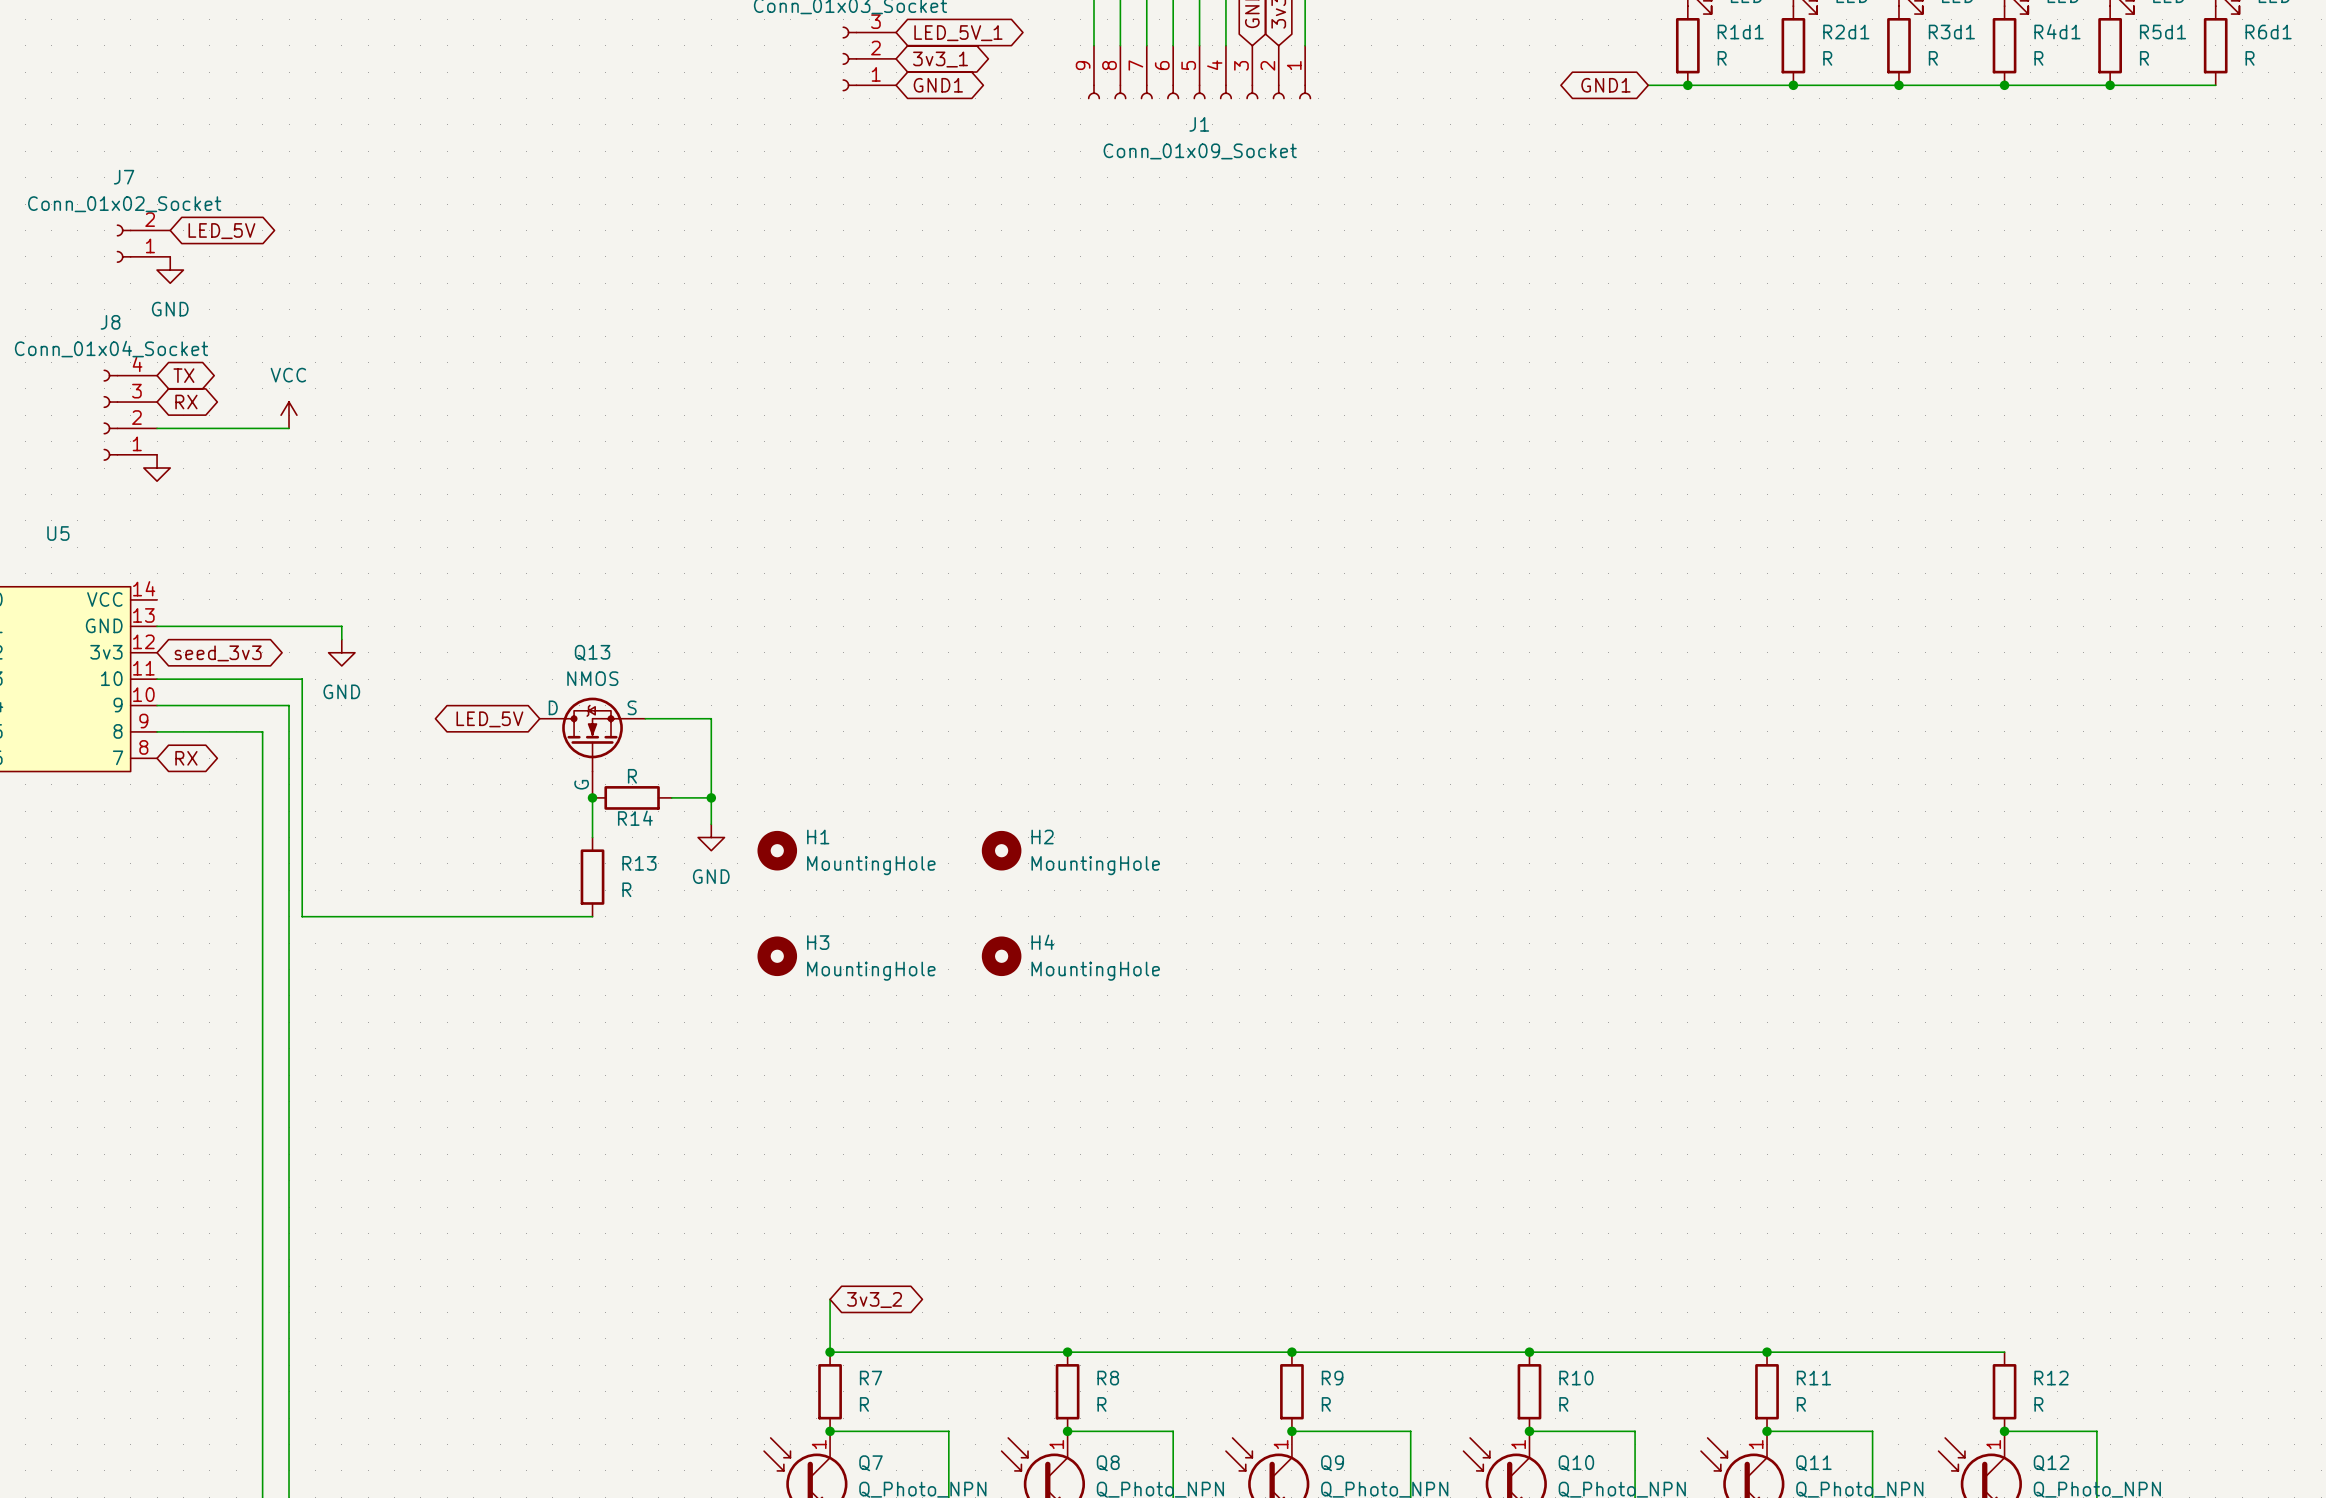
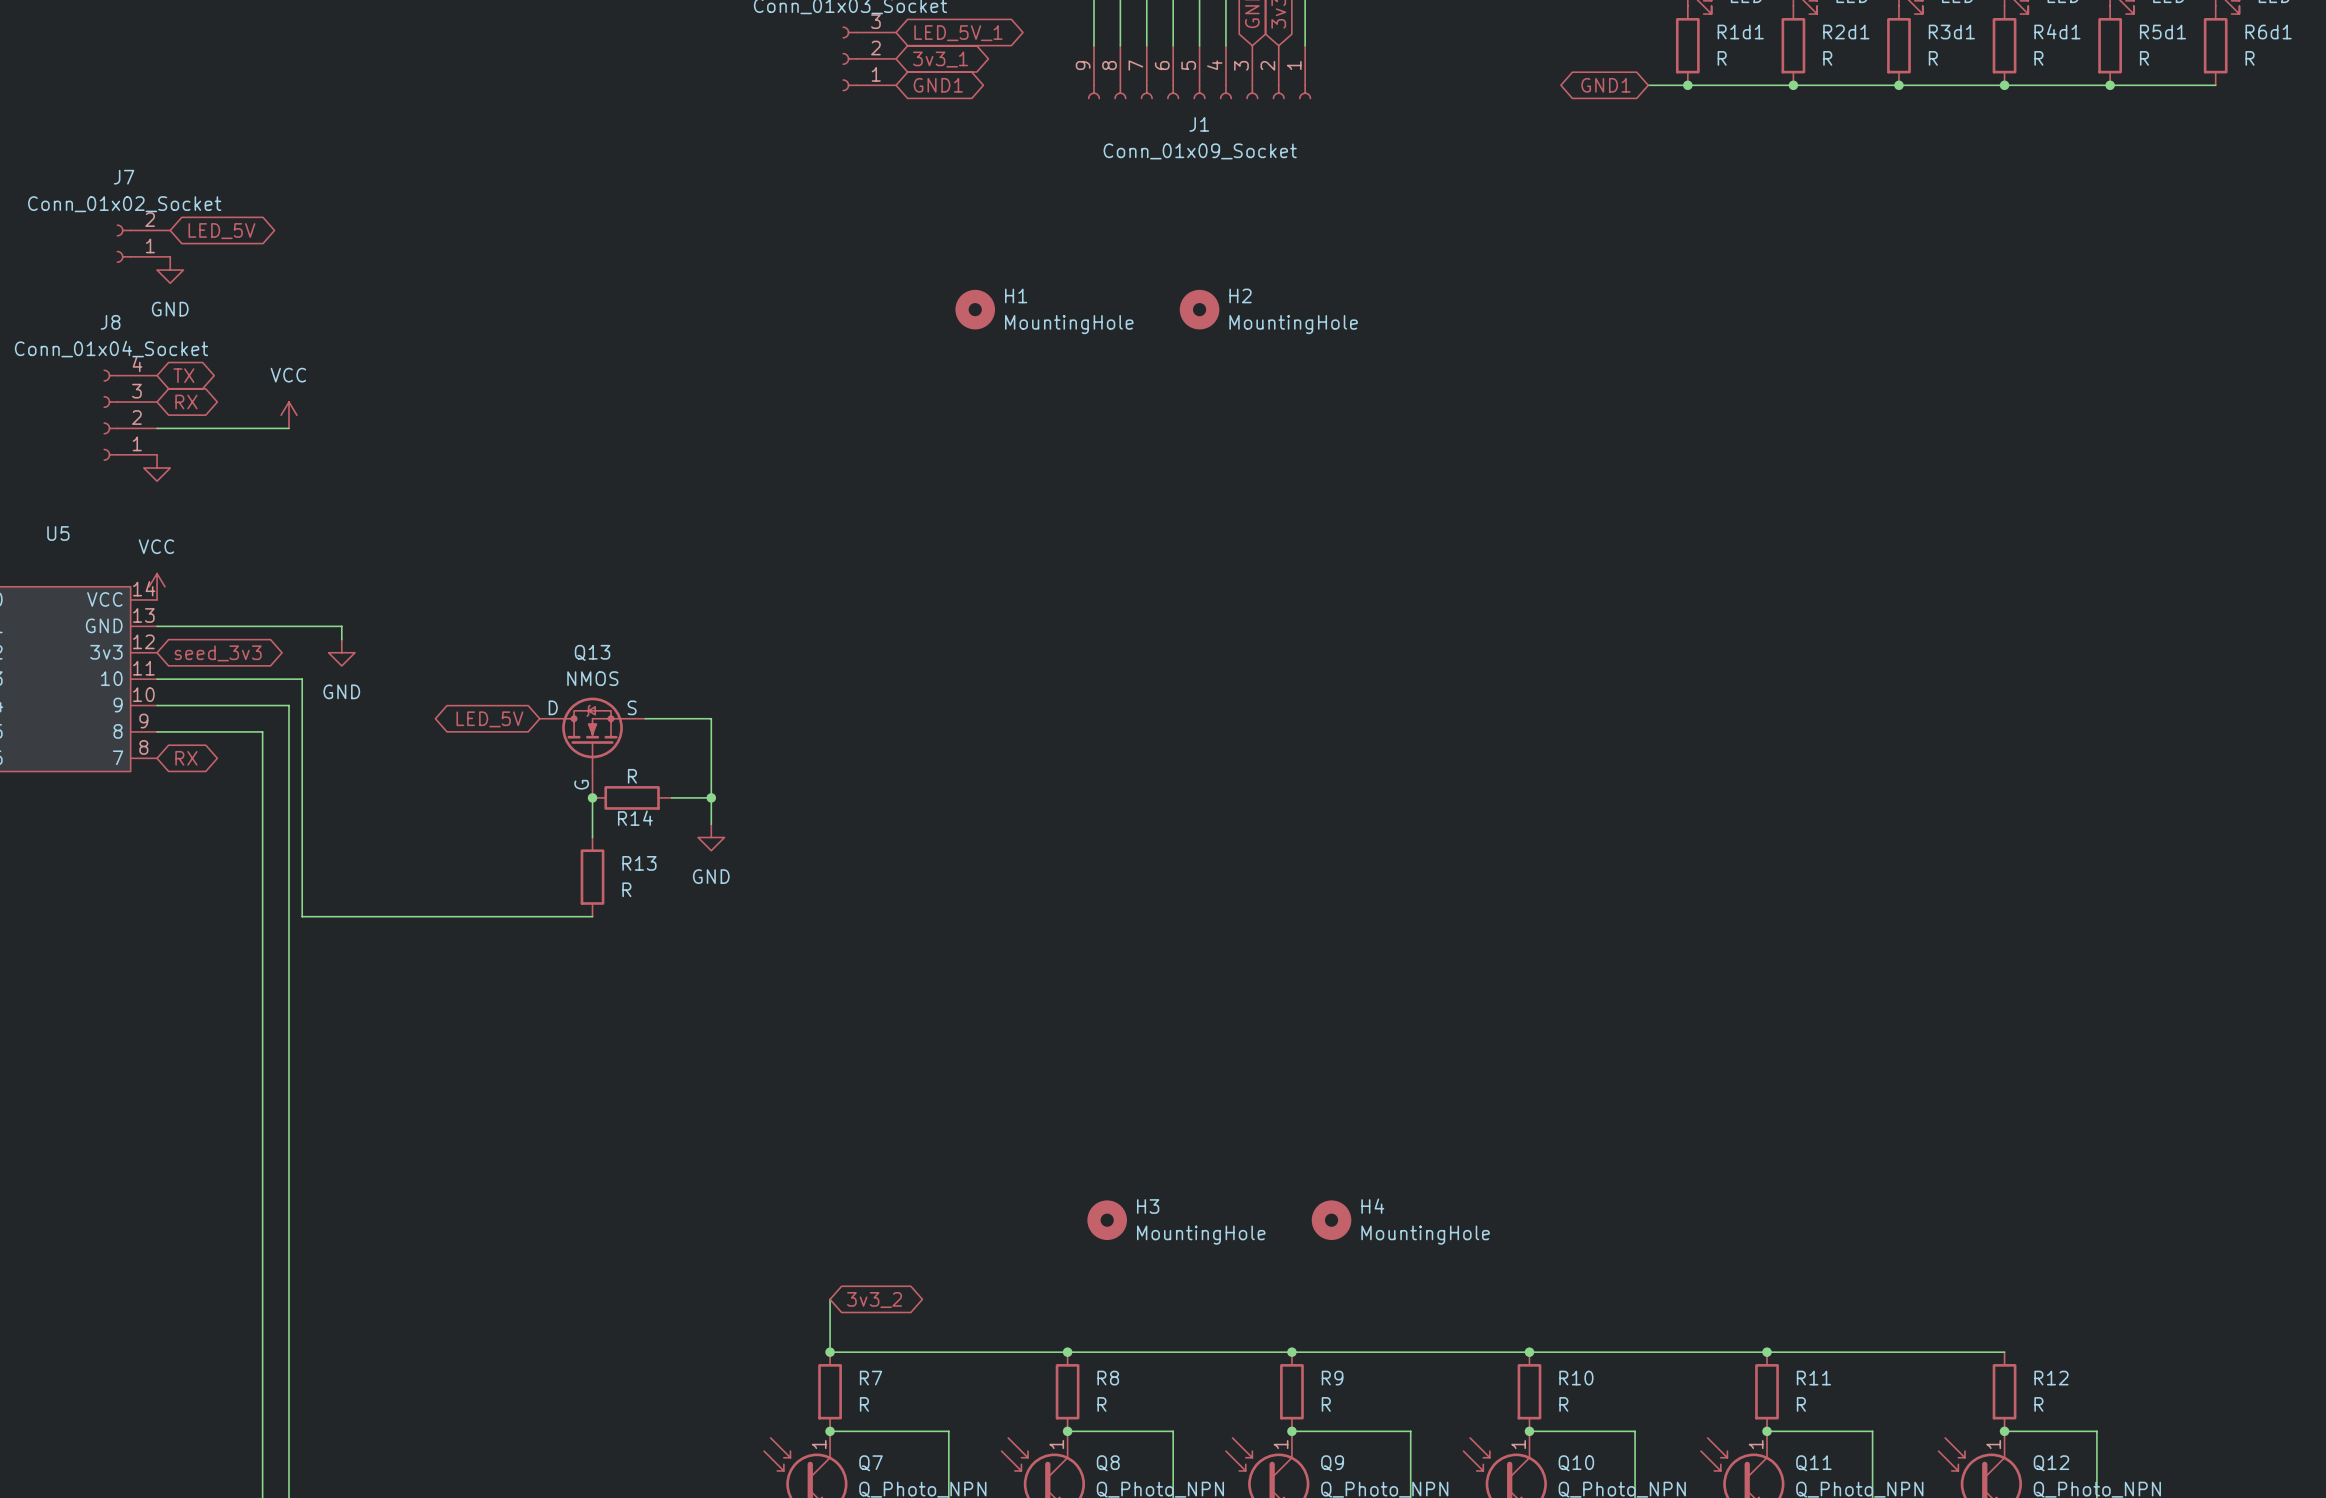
power symbol: none -> VCC (157, 586)
H1 position: (777, 850) -> (975, 309)
H2 position: (1001, 850) -> (1199, 309)
H3 position: (777, 956) -> (1107, 1220)
H4 position: (1001, 956) -> (1331, 1220)

